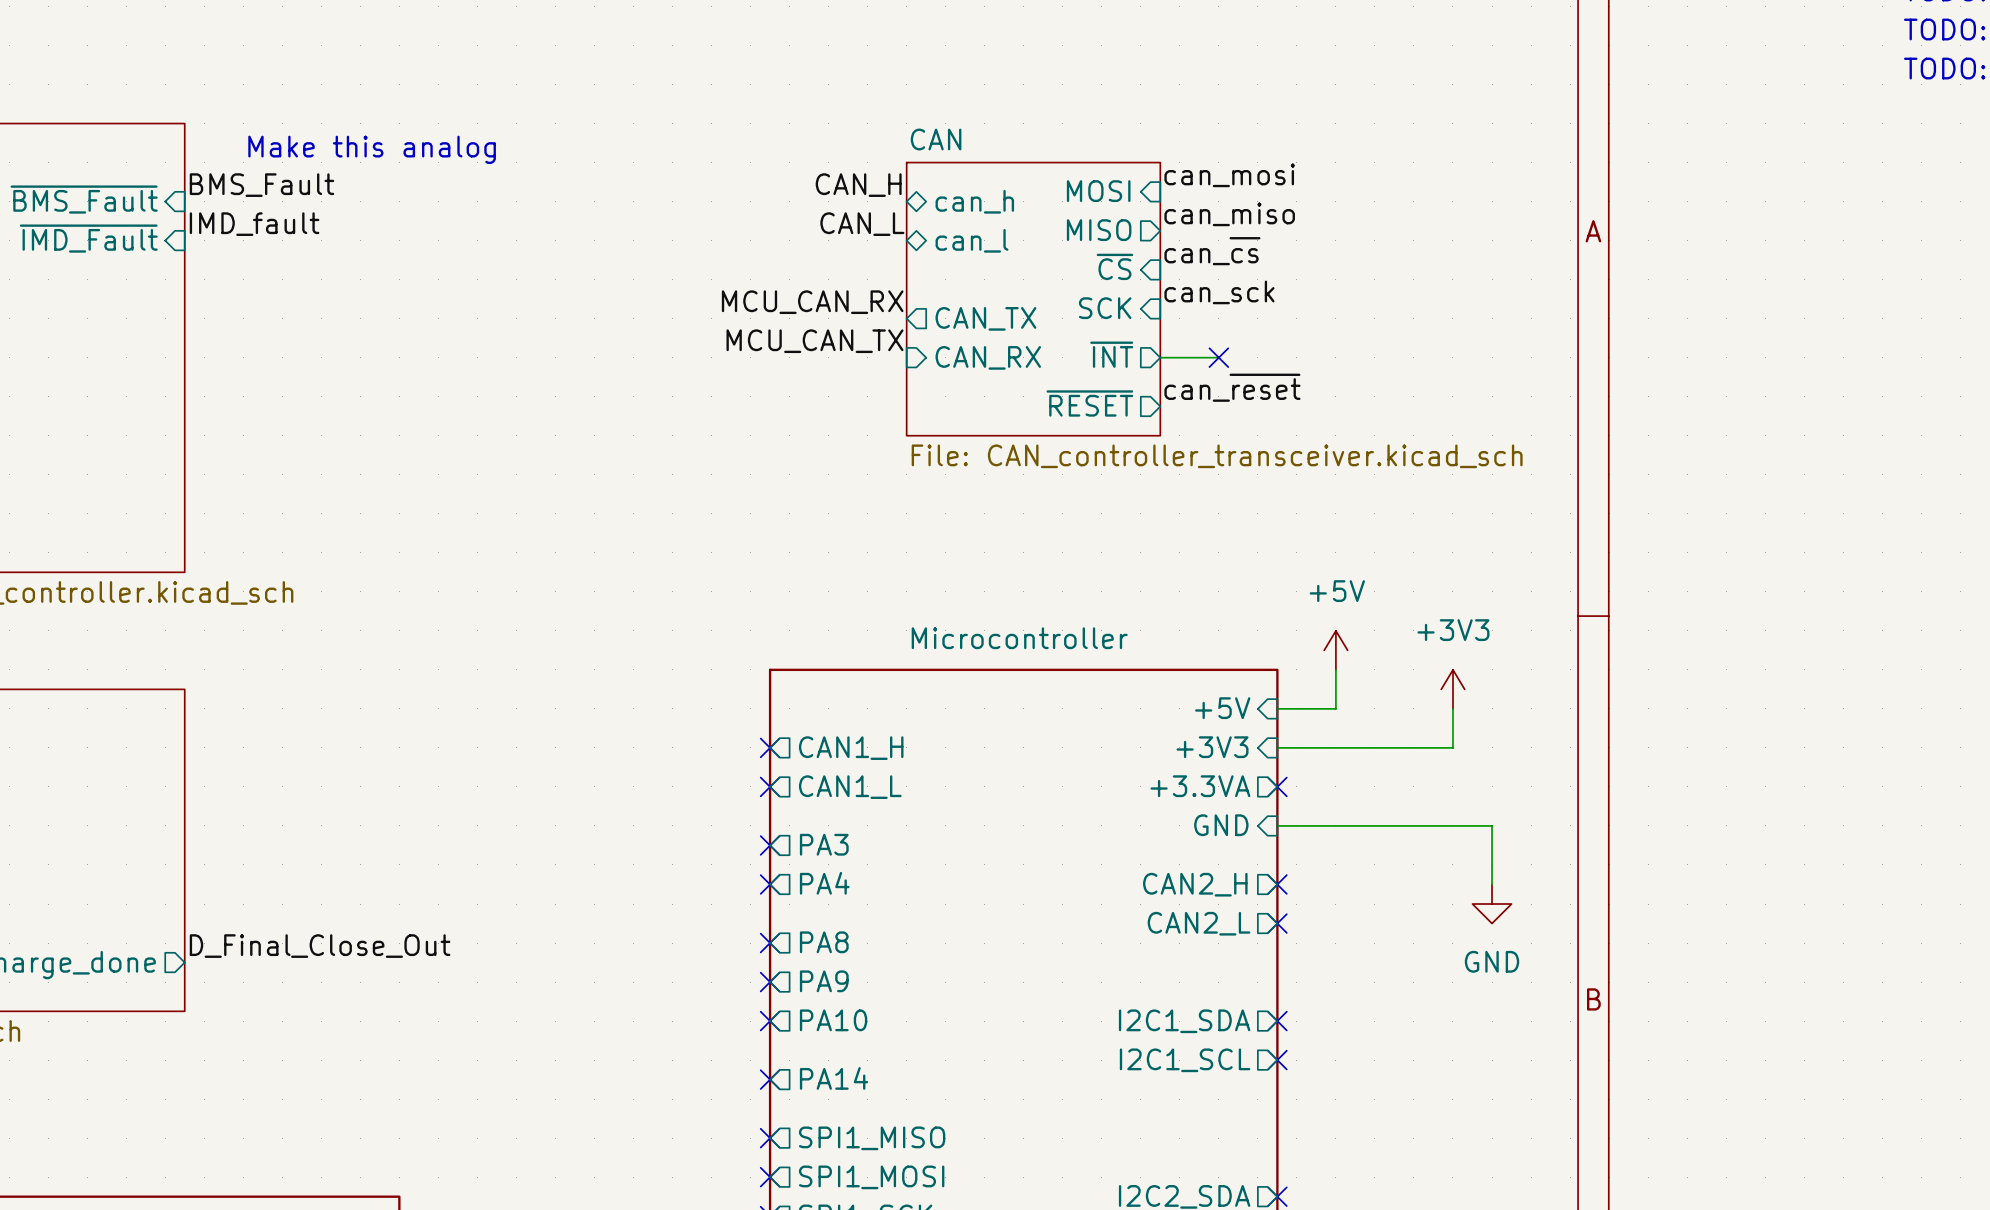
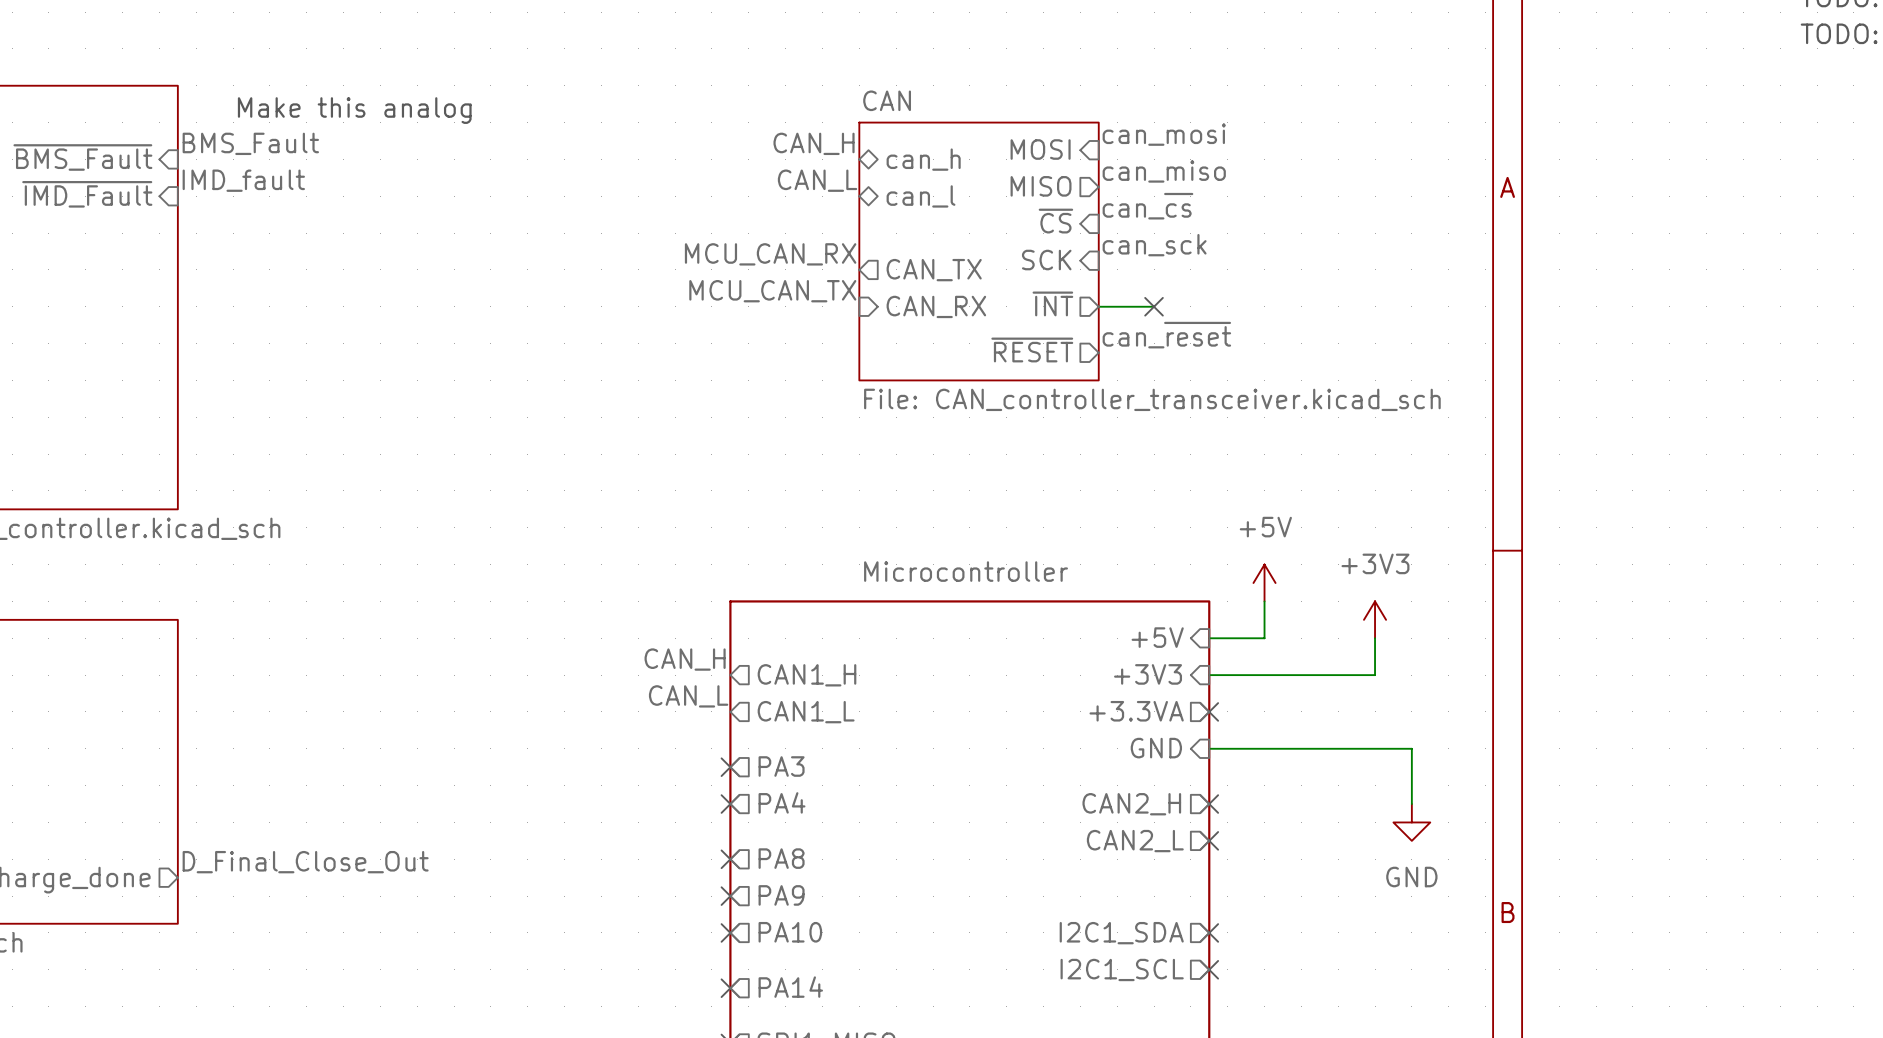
label: none -> CAN_H (685, 659)
no-connect mark: (770, 747) -> none
label: none -> CAN_L (688, 696)
no-connect mark: (770, 786) -> none

